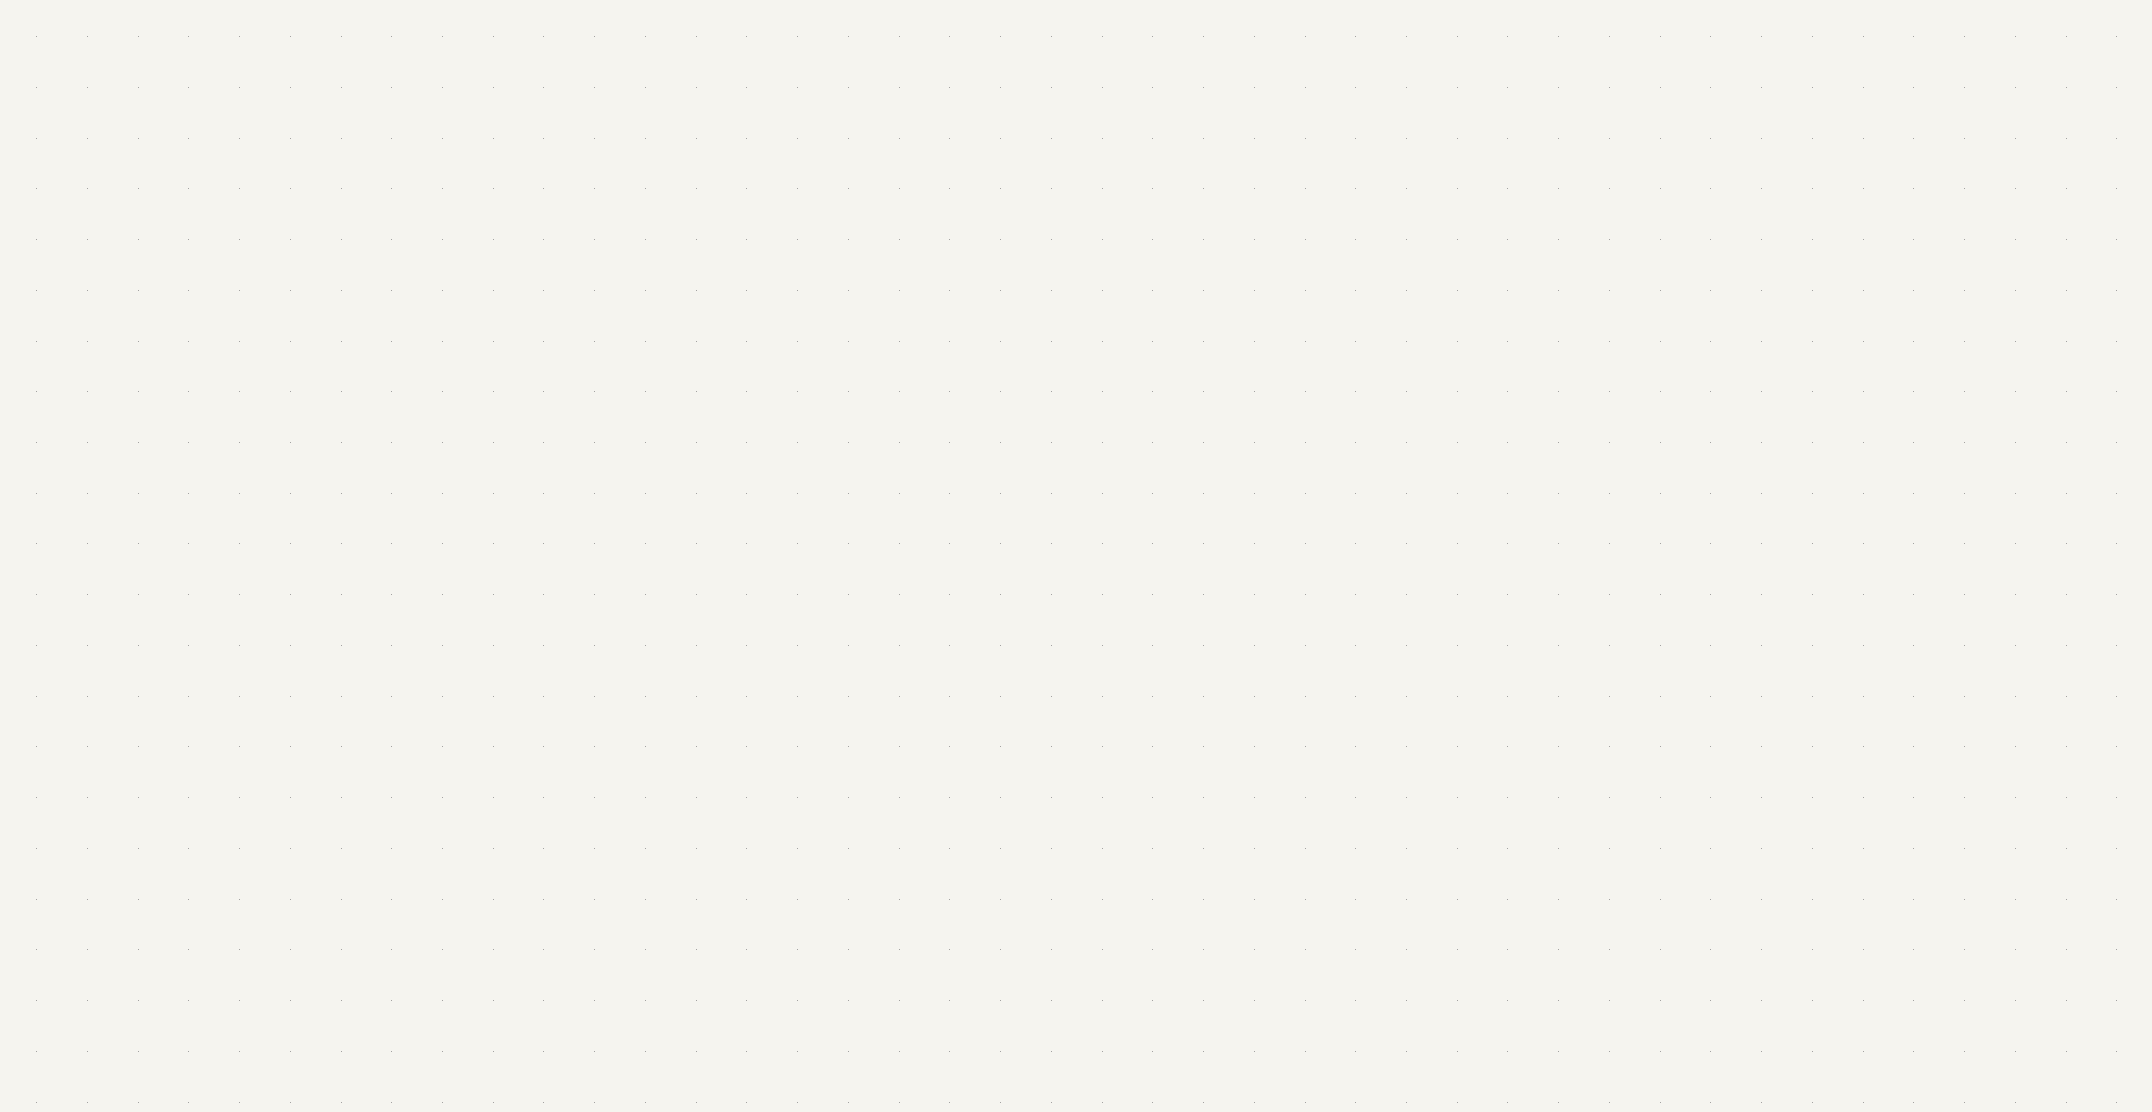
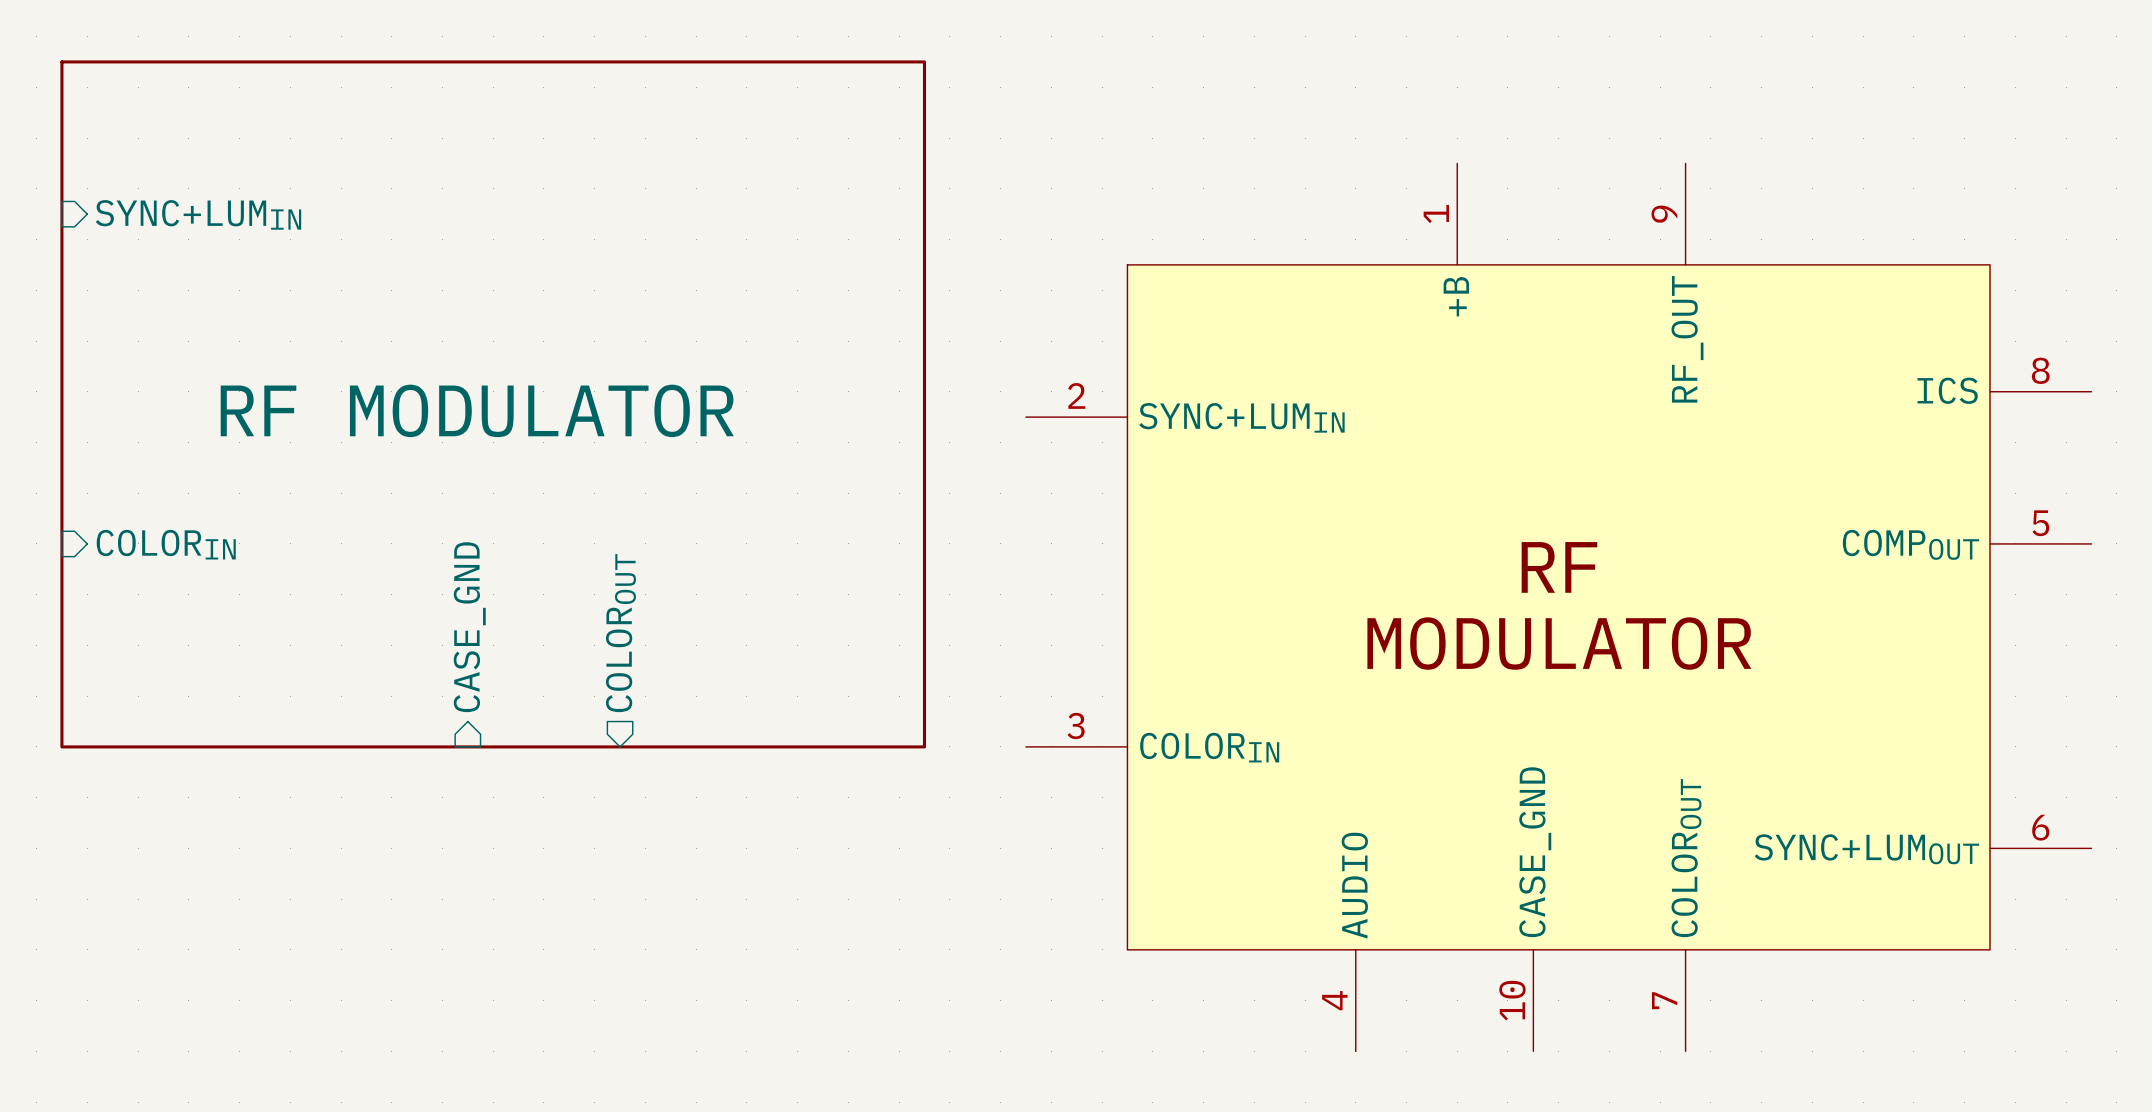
sheet pin: none -> SYNC+LUMIN (198, 214)
sheet RF MODULATOR: none -> (493, 404)
sheet pin: none -> COLORIN (166, 544)
part: none -> (1558, 607)
sheet pin: none -> CASE_GND (469, 627)
sheet pin: none -> COLOROUT (620, 633)

